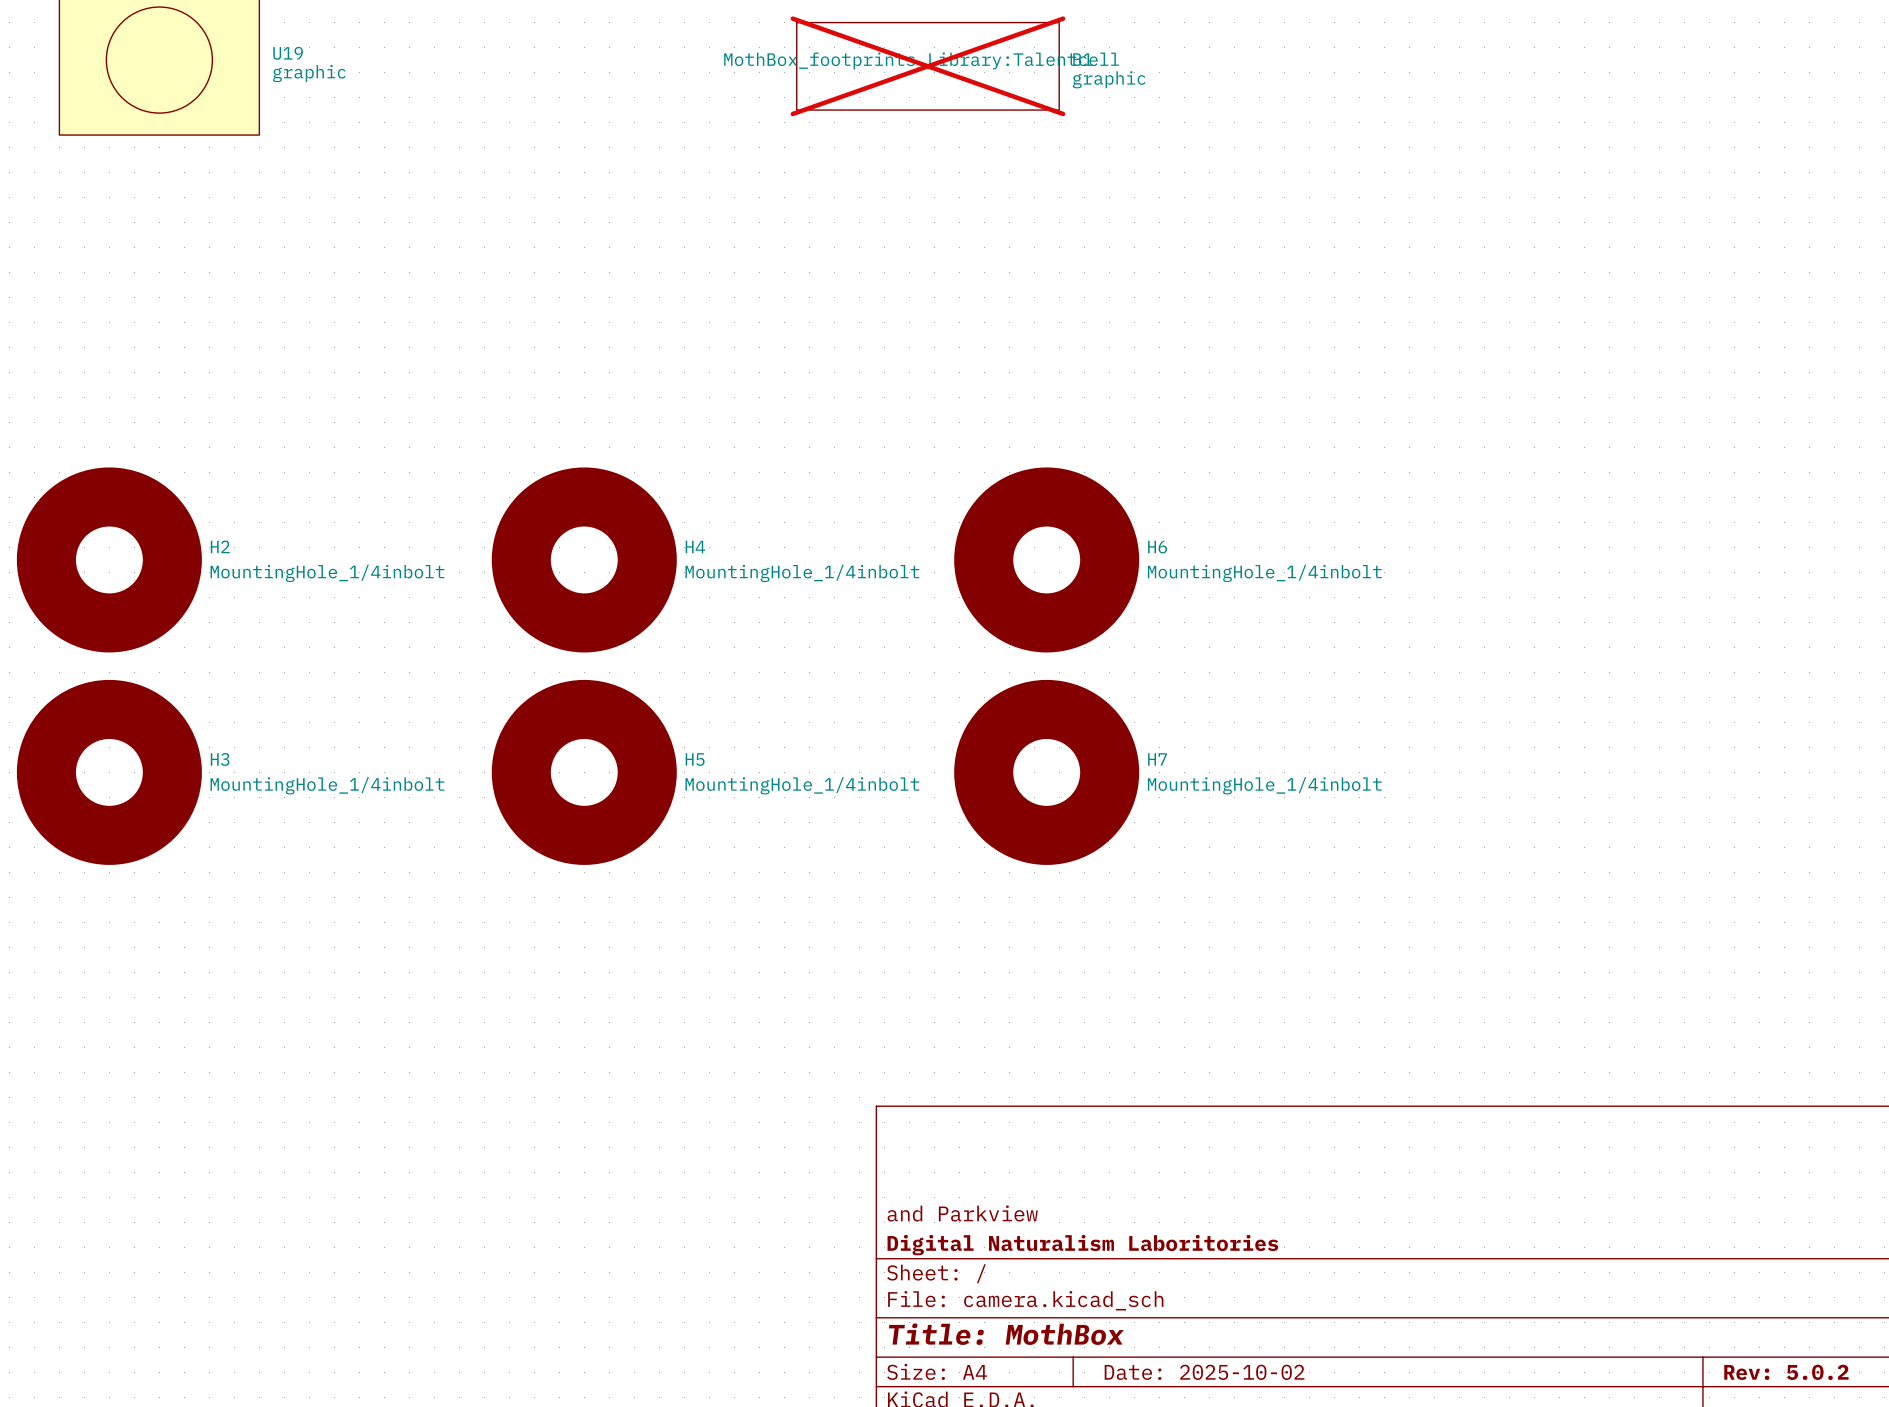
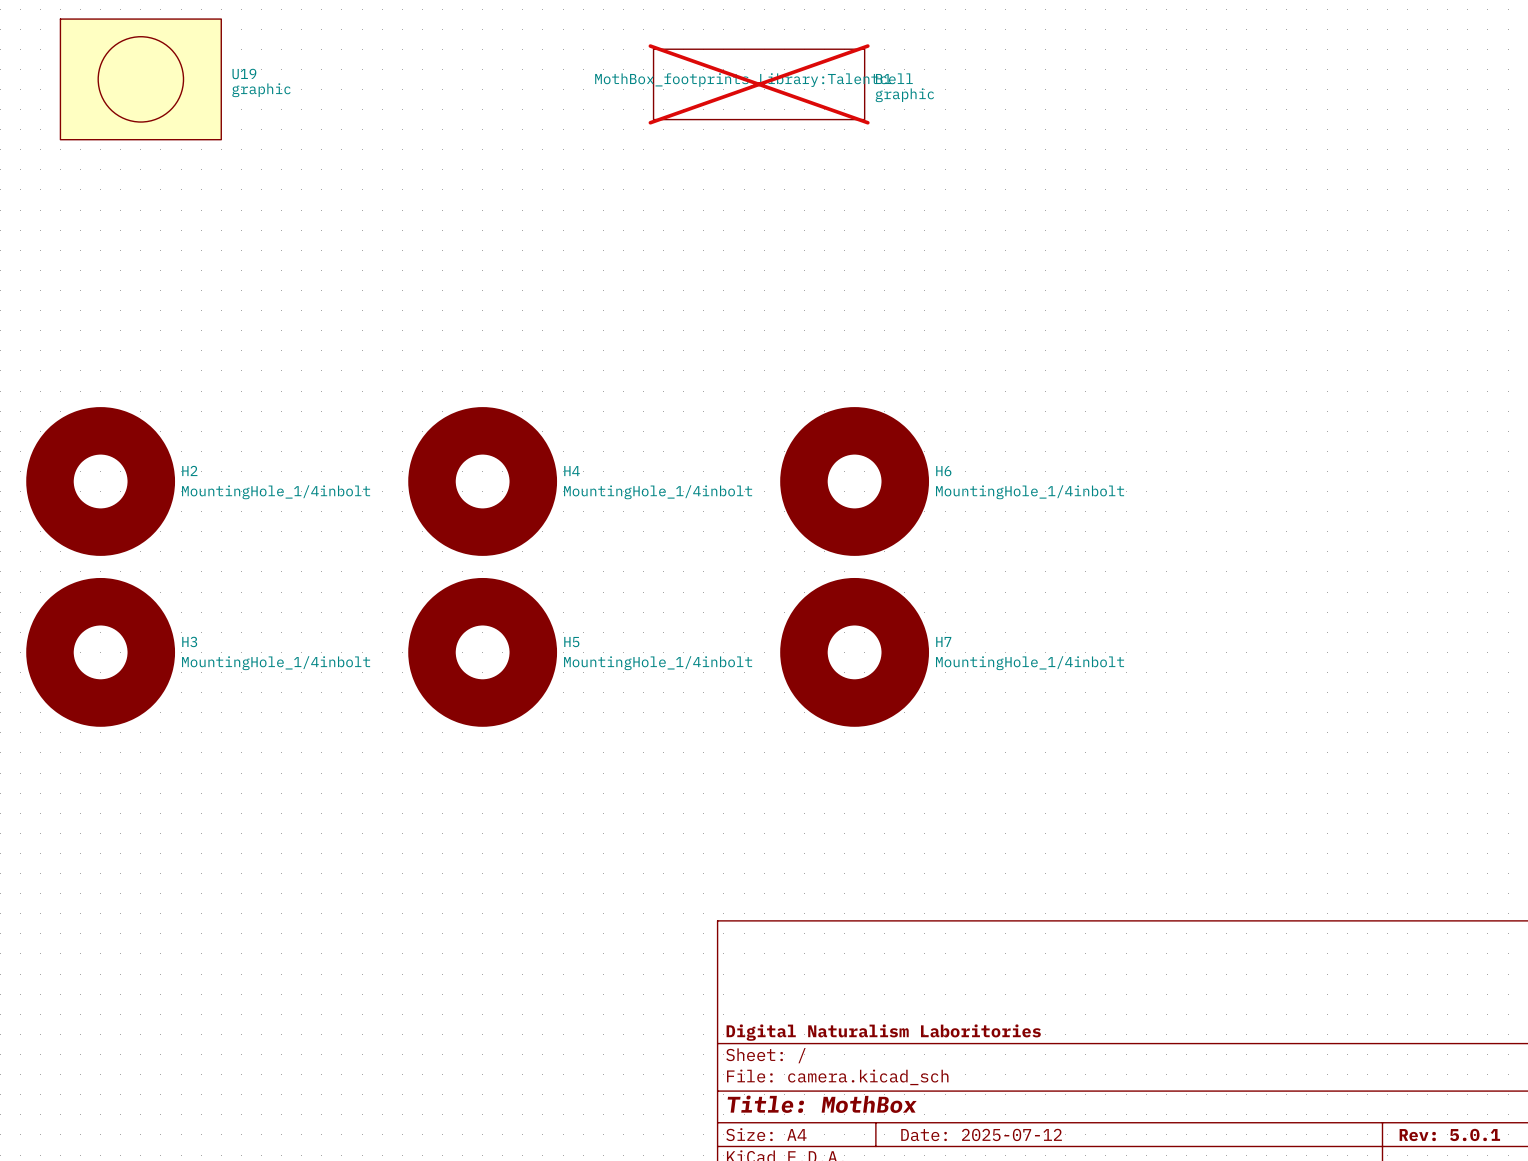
title block: and Parkview (962, 1213) -> none
title block: Date: 2025-10-02 (1204, 1372) -> Date: 2025-07-12 (981, 1134)
title block: Rev: 5.0.2 (1786, 1372) -> Rev: 5.0.1 (1449, 1134)

